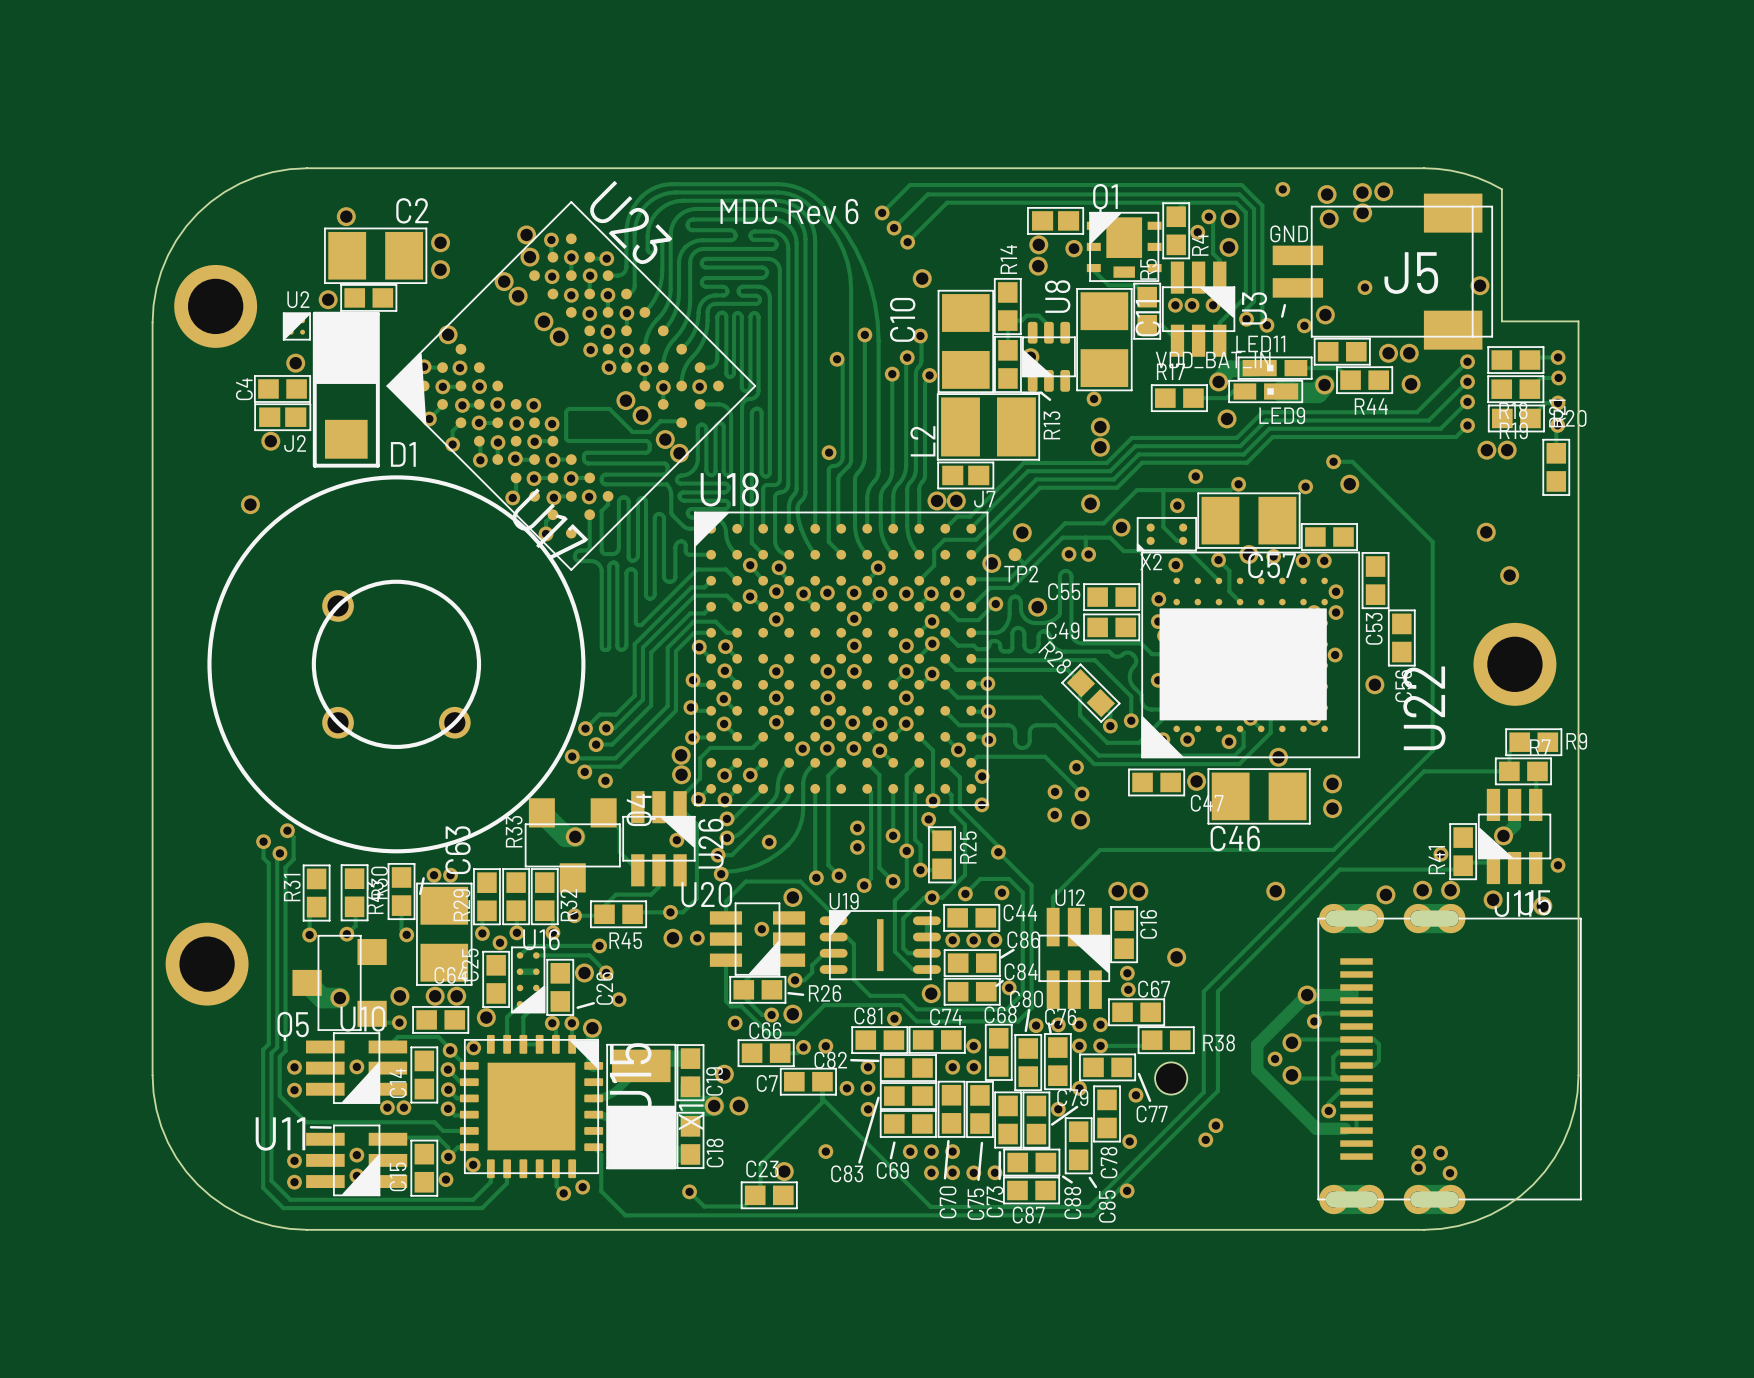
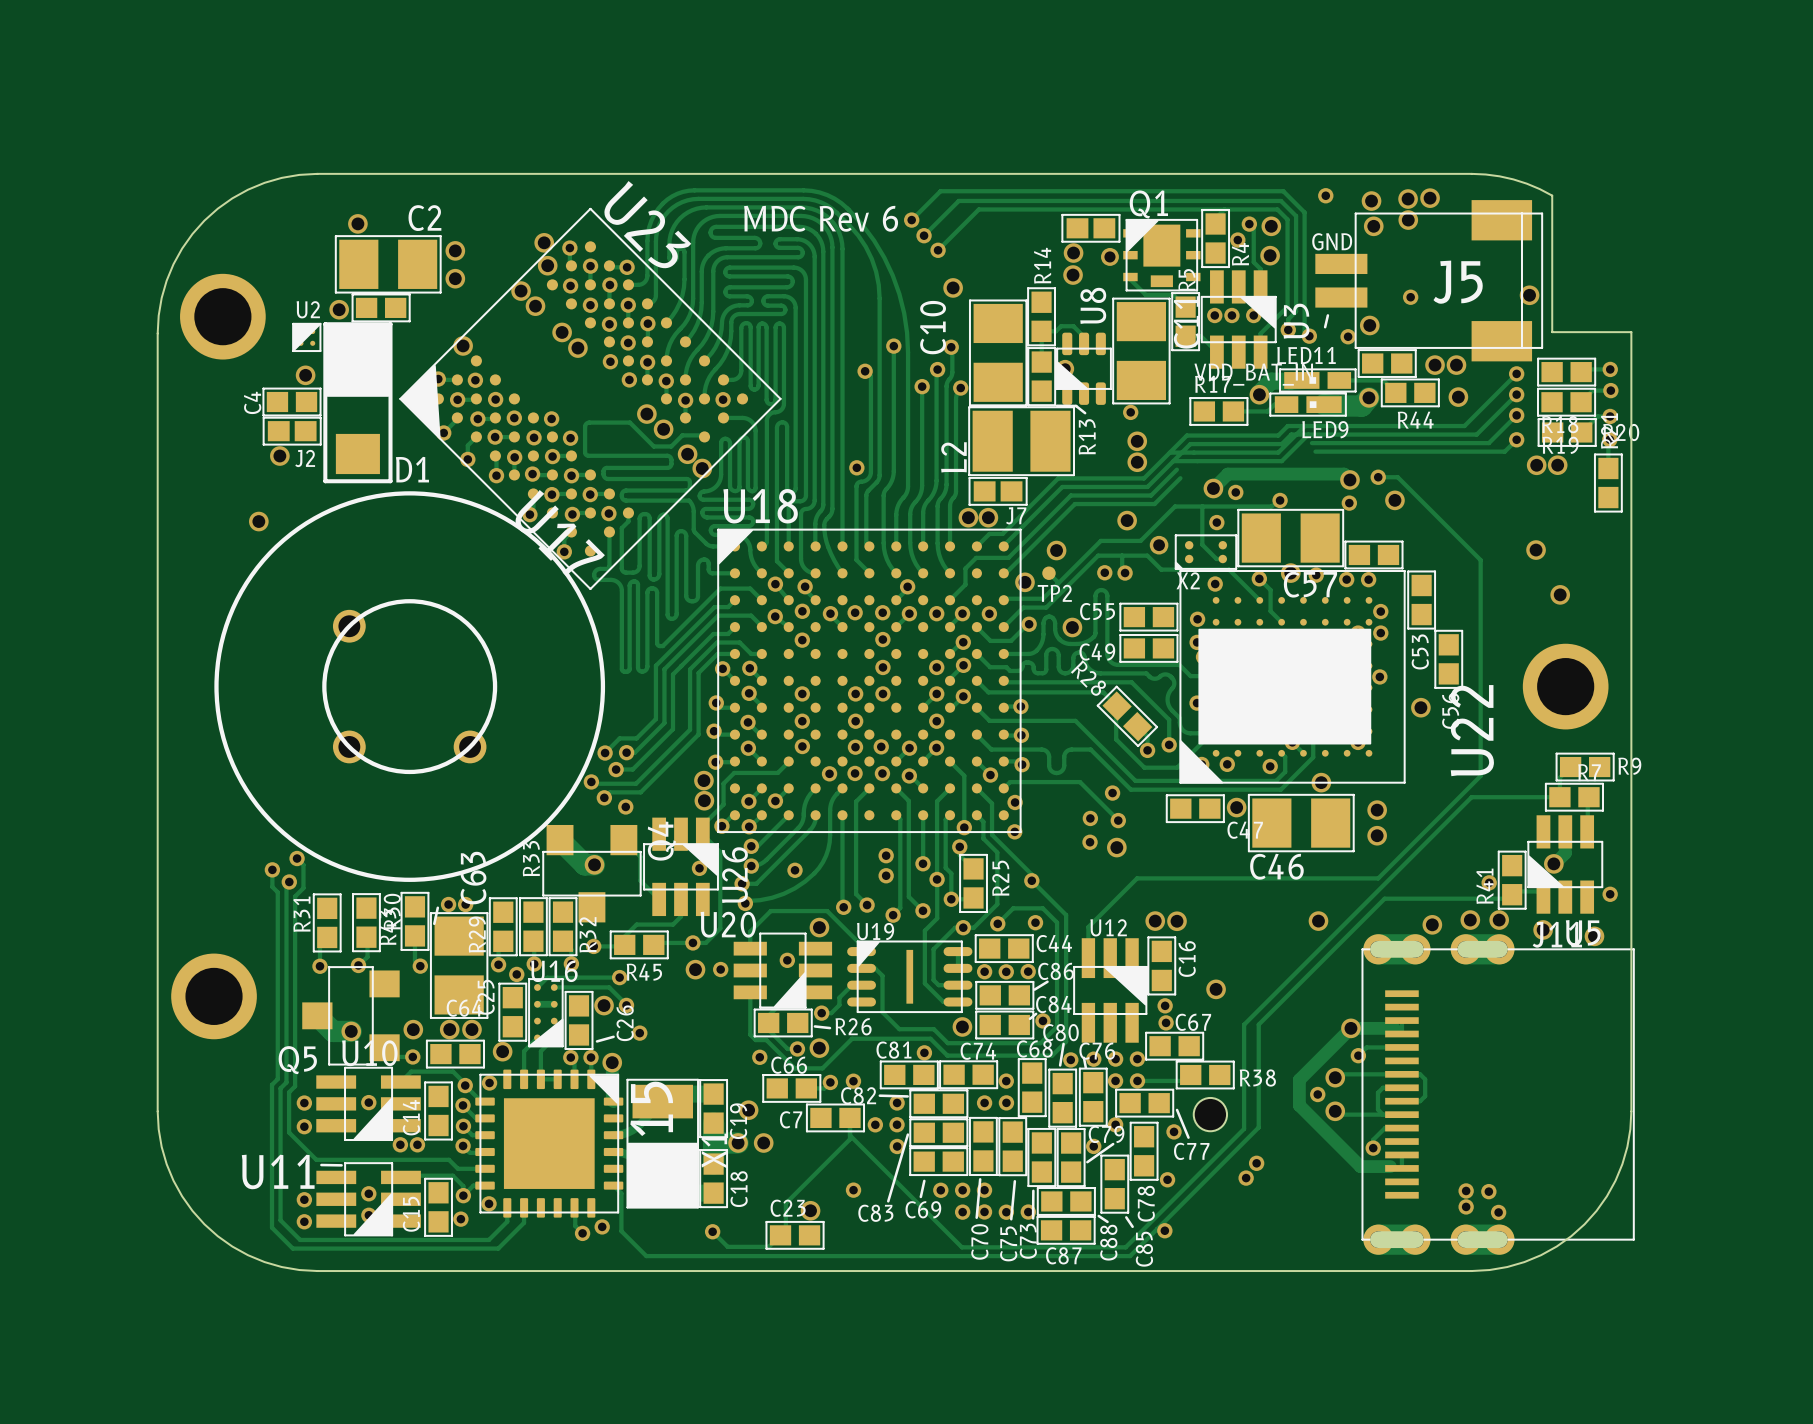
track: none -> (1304, 426) (1287, 426) (1278, 435) (1186, 435) (1169, 452)
via: (1227, 418) -> none
track: none -> (1308, 434) (1291, 434) (1281, 444) (1190, 444) (1173, 461)
track: (1269, 428) (1243, 454) (1138, 454) -> none
track: (1272, 437) (1247, 462) (1142, 462) -> none
track: none -> (1349, 479) (1344, 474) (1227, 474) (1213, 488)
via: none -> (1349, 479)
via: none -> (1213, 488)

